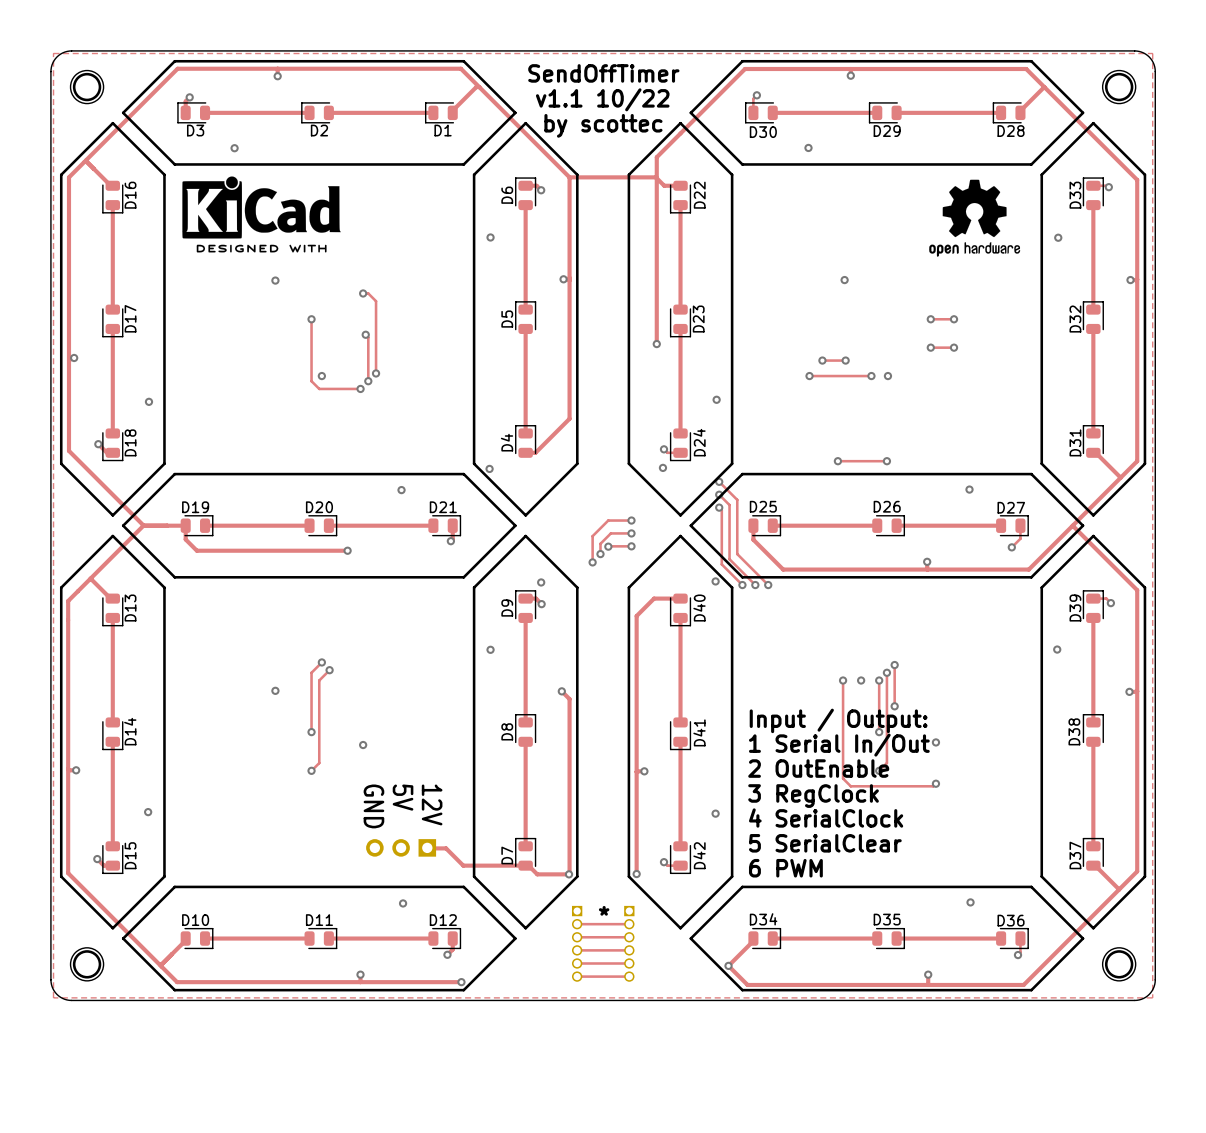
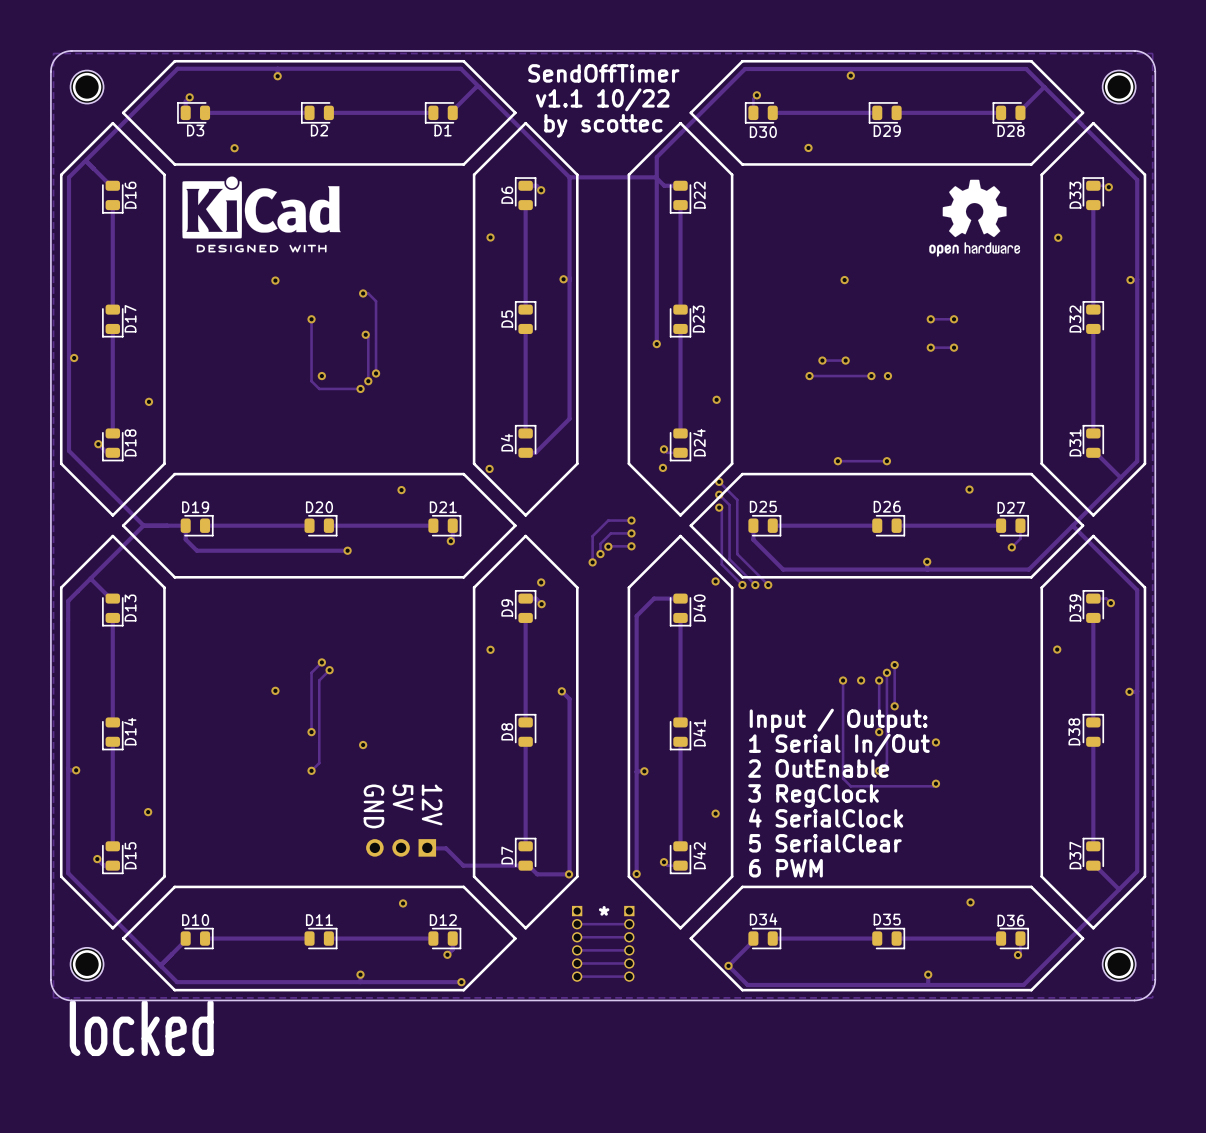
text: none -> locked (141, 1027)

